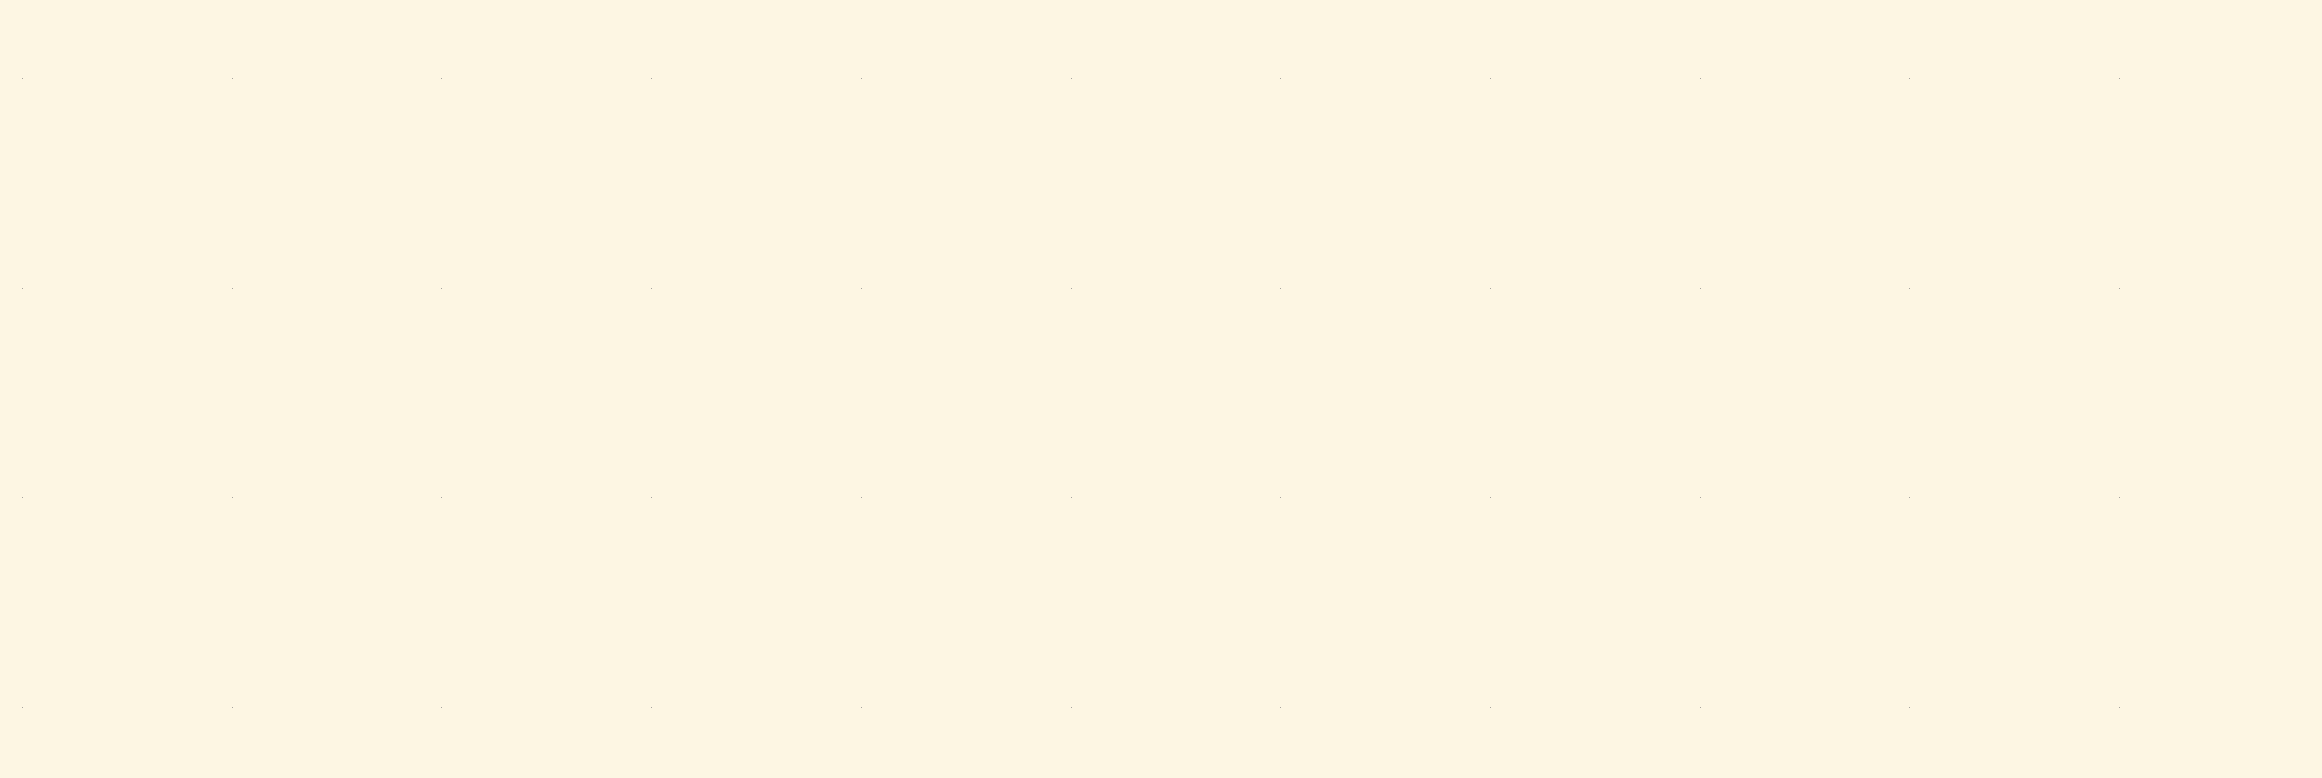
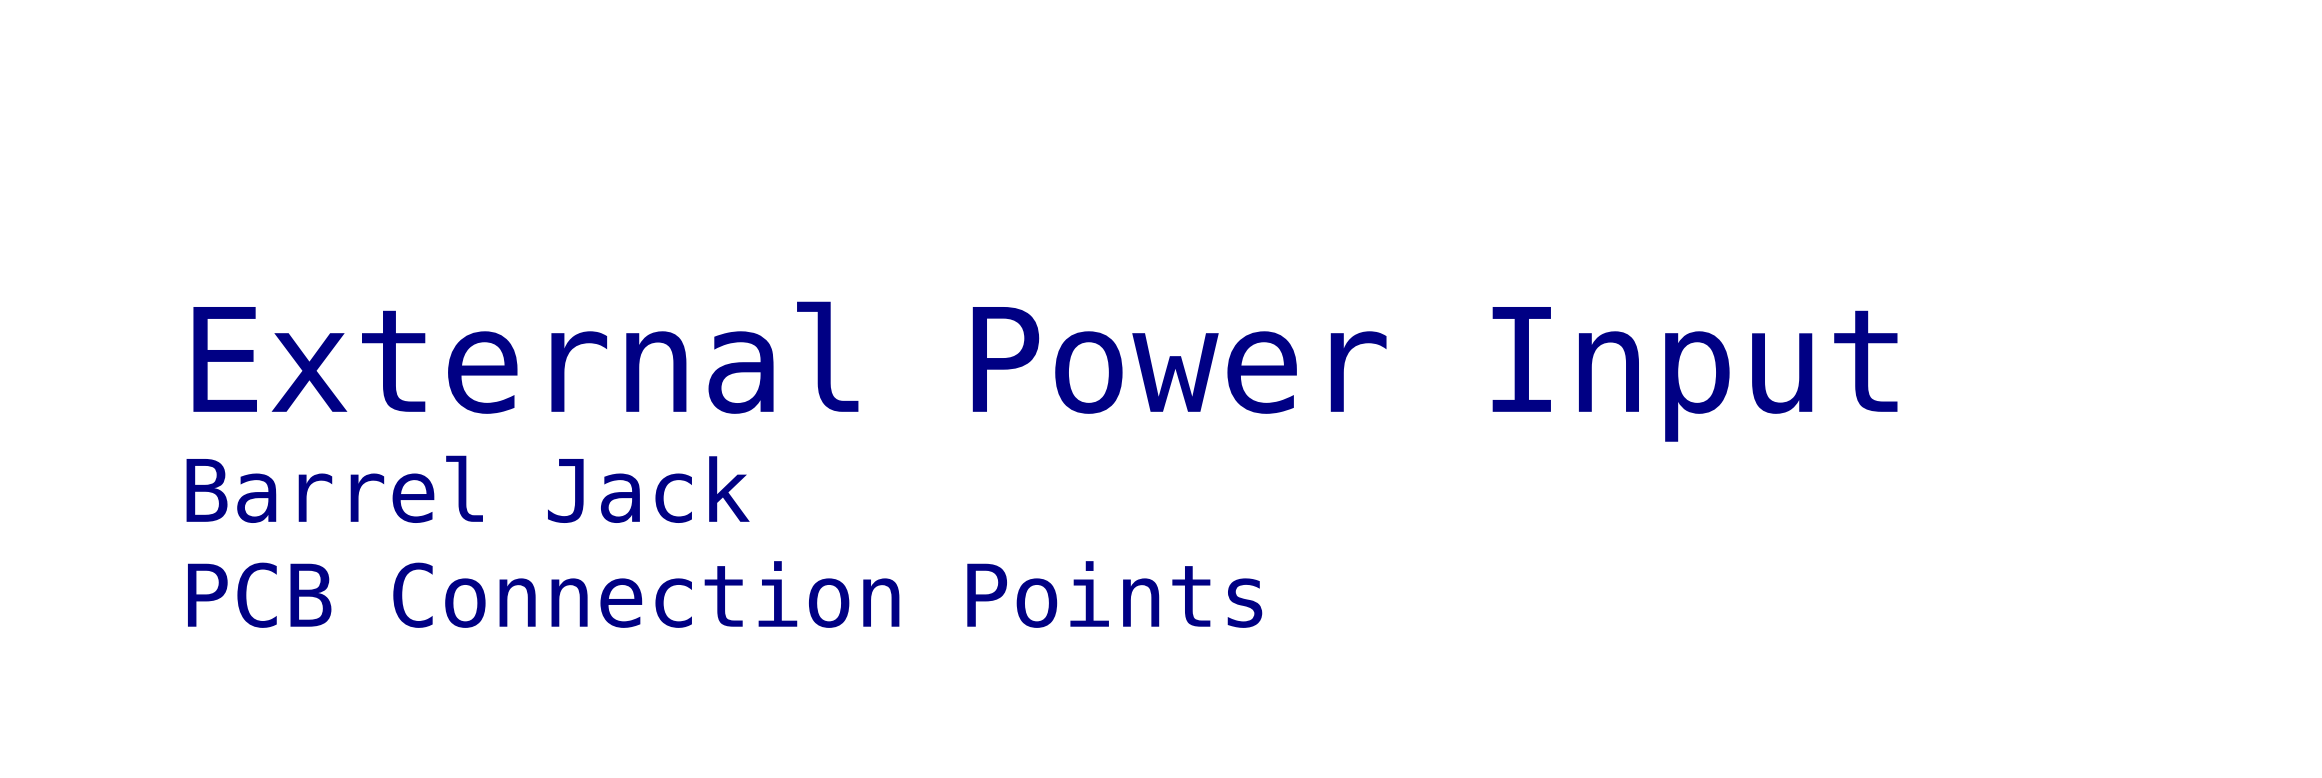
text: none -> External Power Input (1045, 371)
text: none -> Barrel Jack (468, 489)
text: none -> PCB Connection Points (725, 594)

